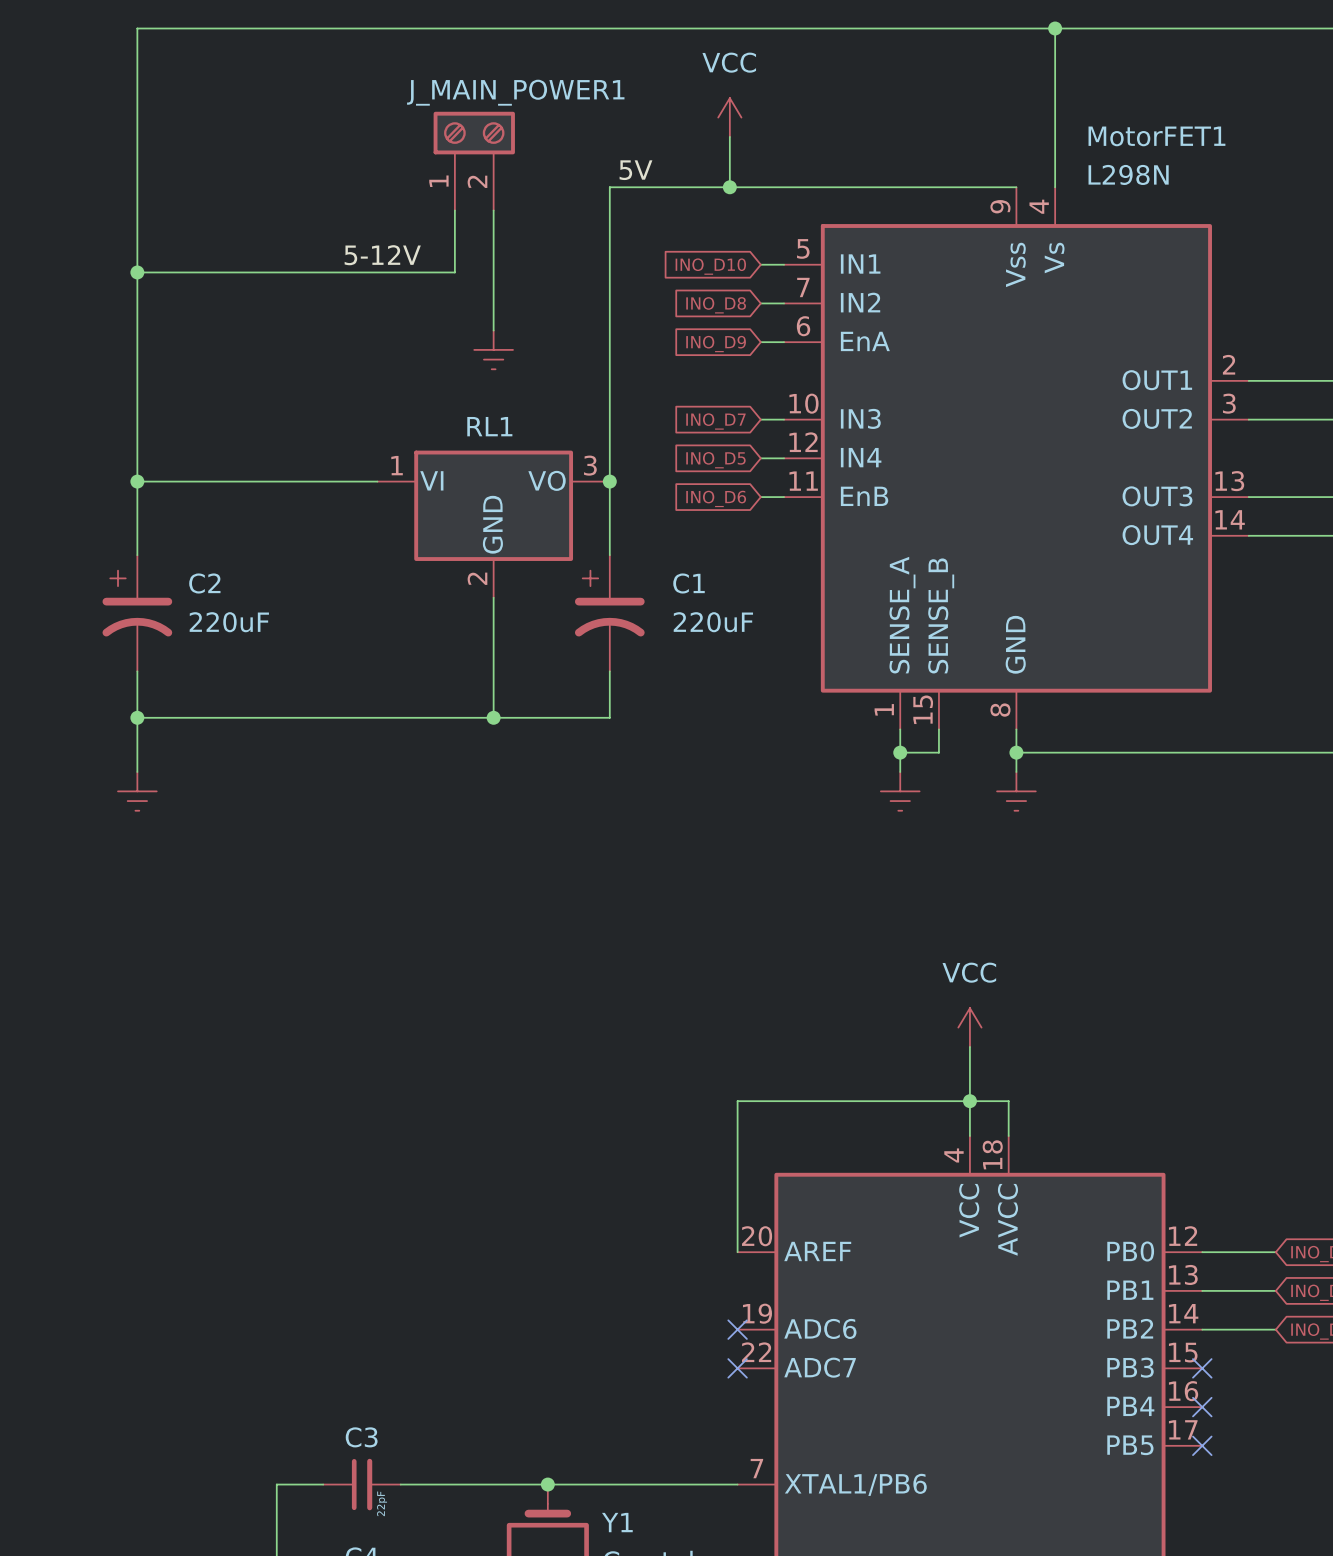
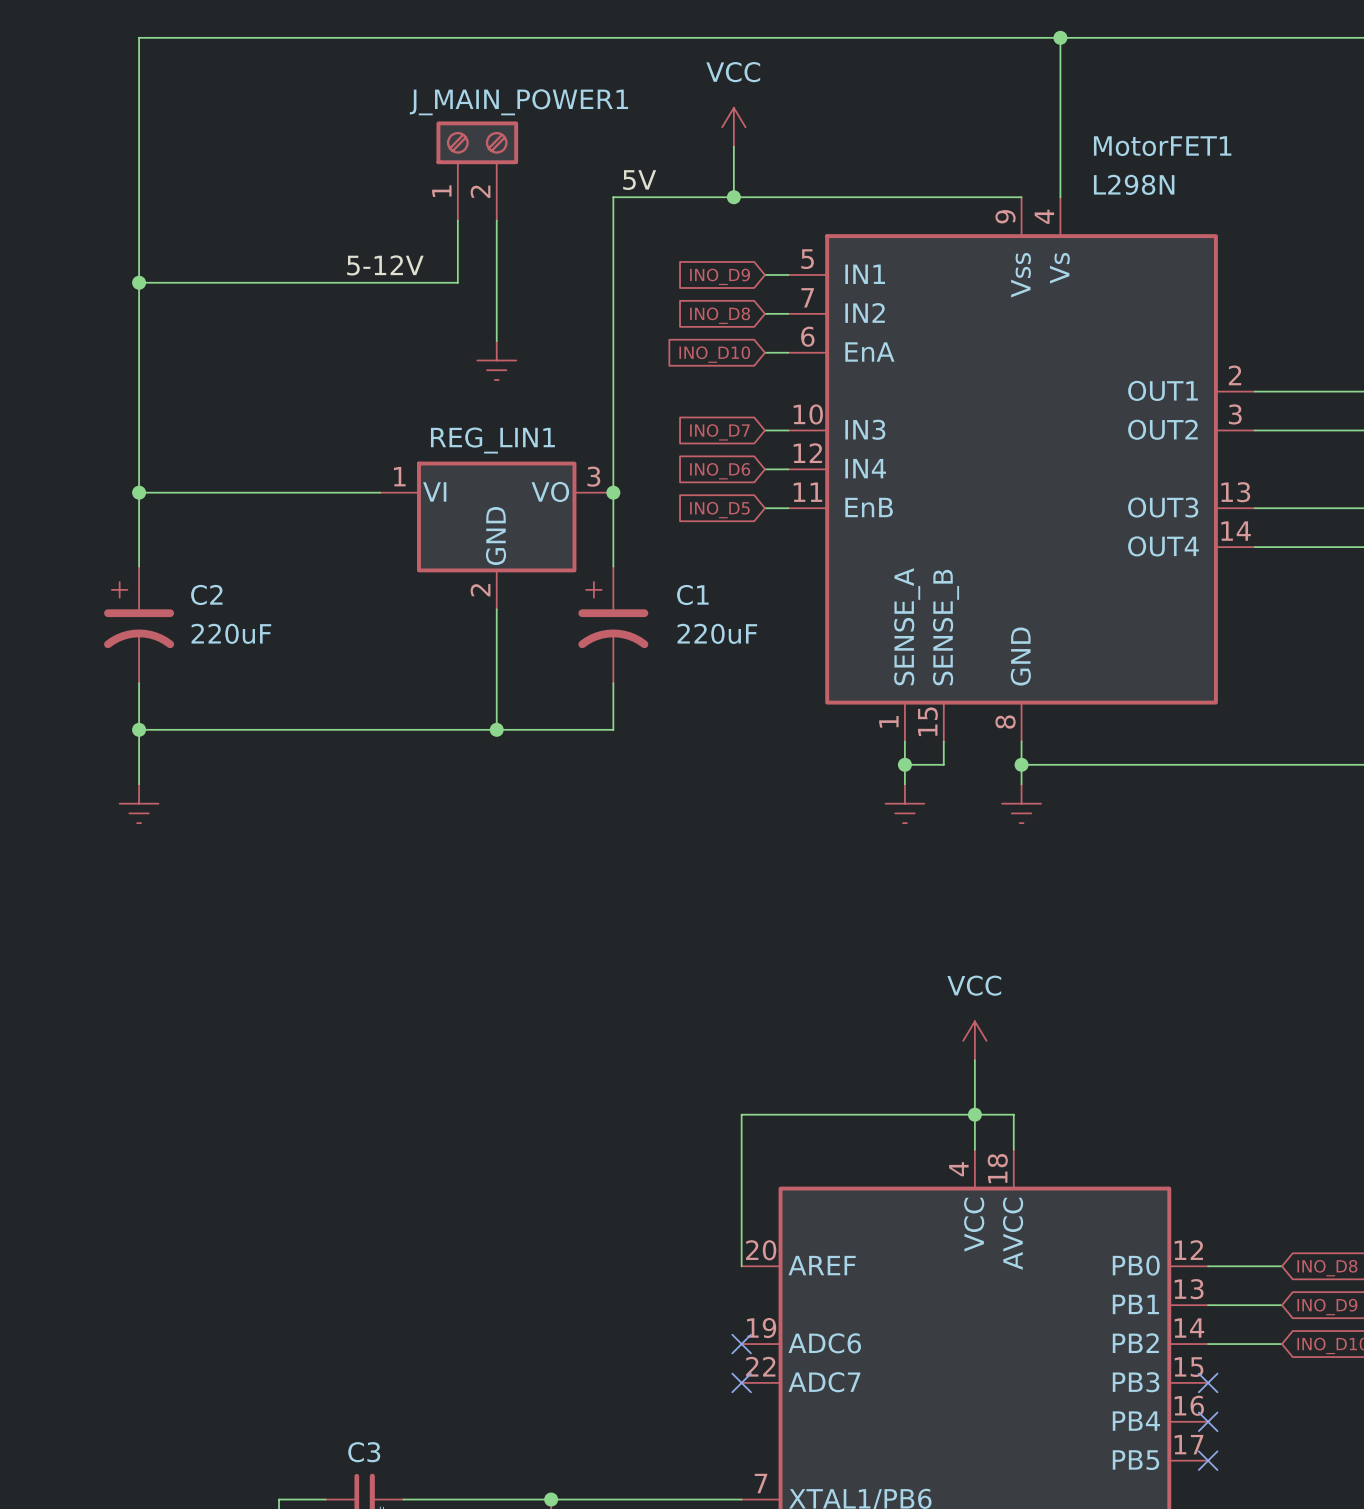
global label: INO_D10 (710, 266) -> INO_D9 (720, 276)
global label: INO_D9 (716, 344) -> INO_D10 (714, 354)
RL1 name: RL1 (489, 426) -> REG_LIN1 (492, 440)
global label: INO_D5 (715, 460) -> INO_D6 (720, 471)
global label: INO_D6 (716, 498) -> INO_D5 (719, 510)

